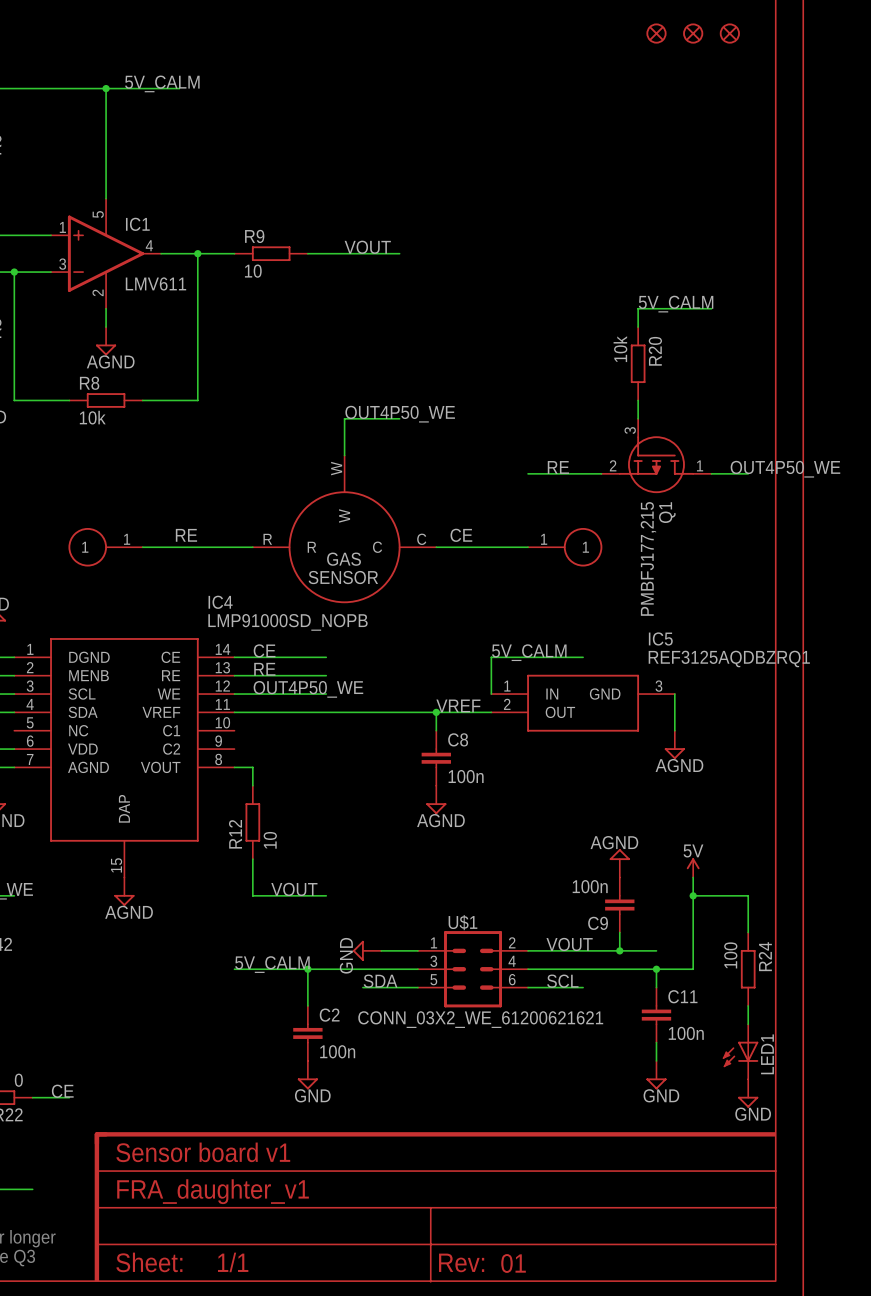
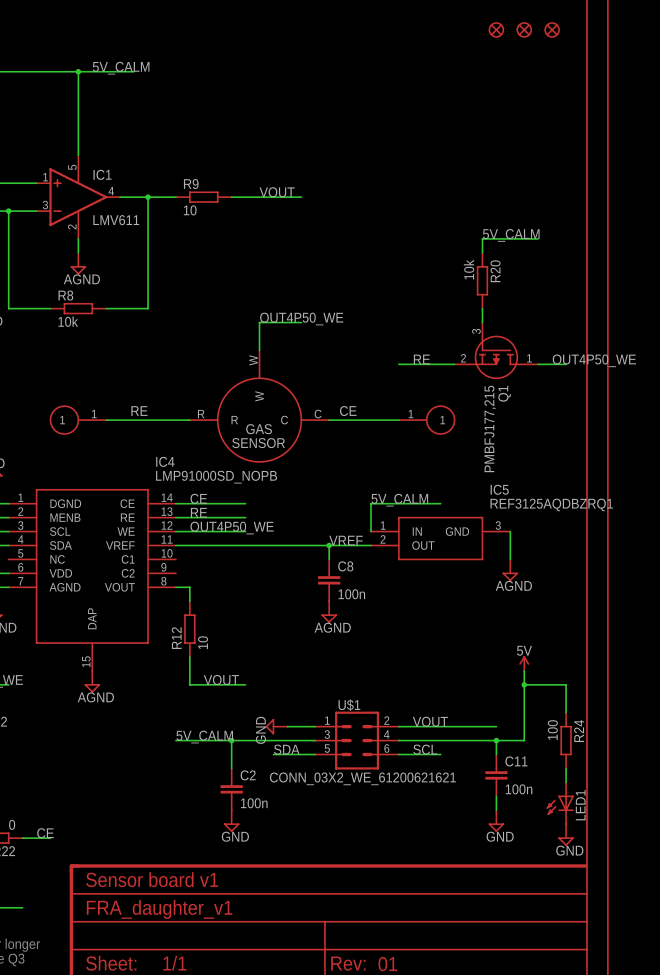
power symbol: AGND (619, 863) -> none
C9: 100n (619, 905) -> none
wire: (619, 932) (619, 950) -> none
junction: (619, 950) -> none

